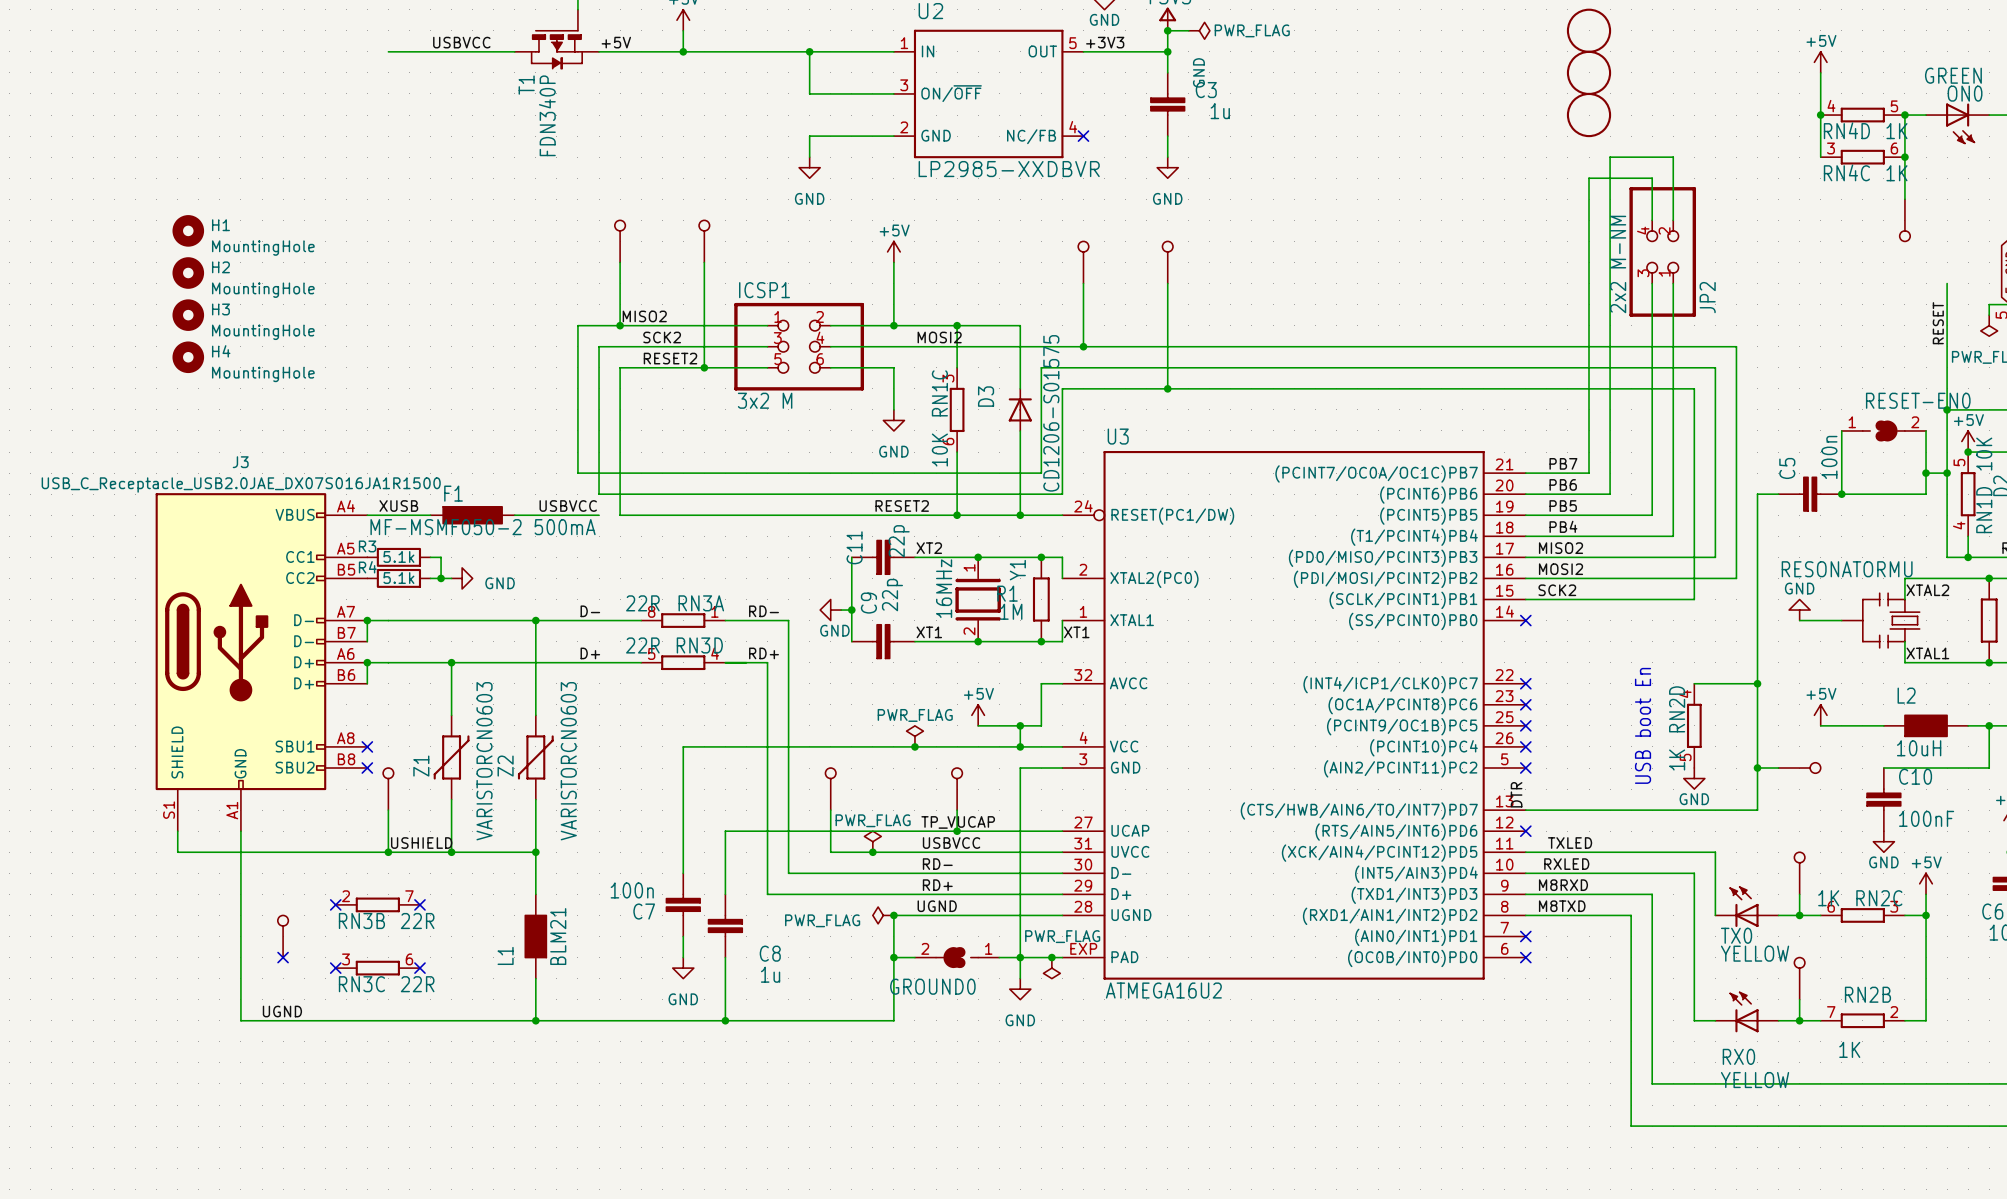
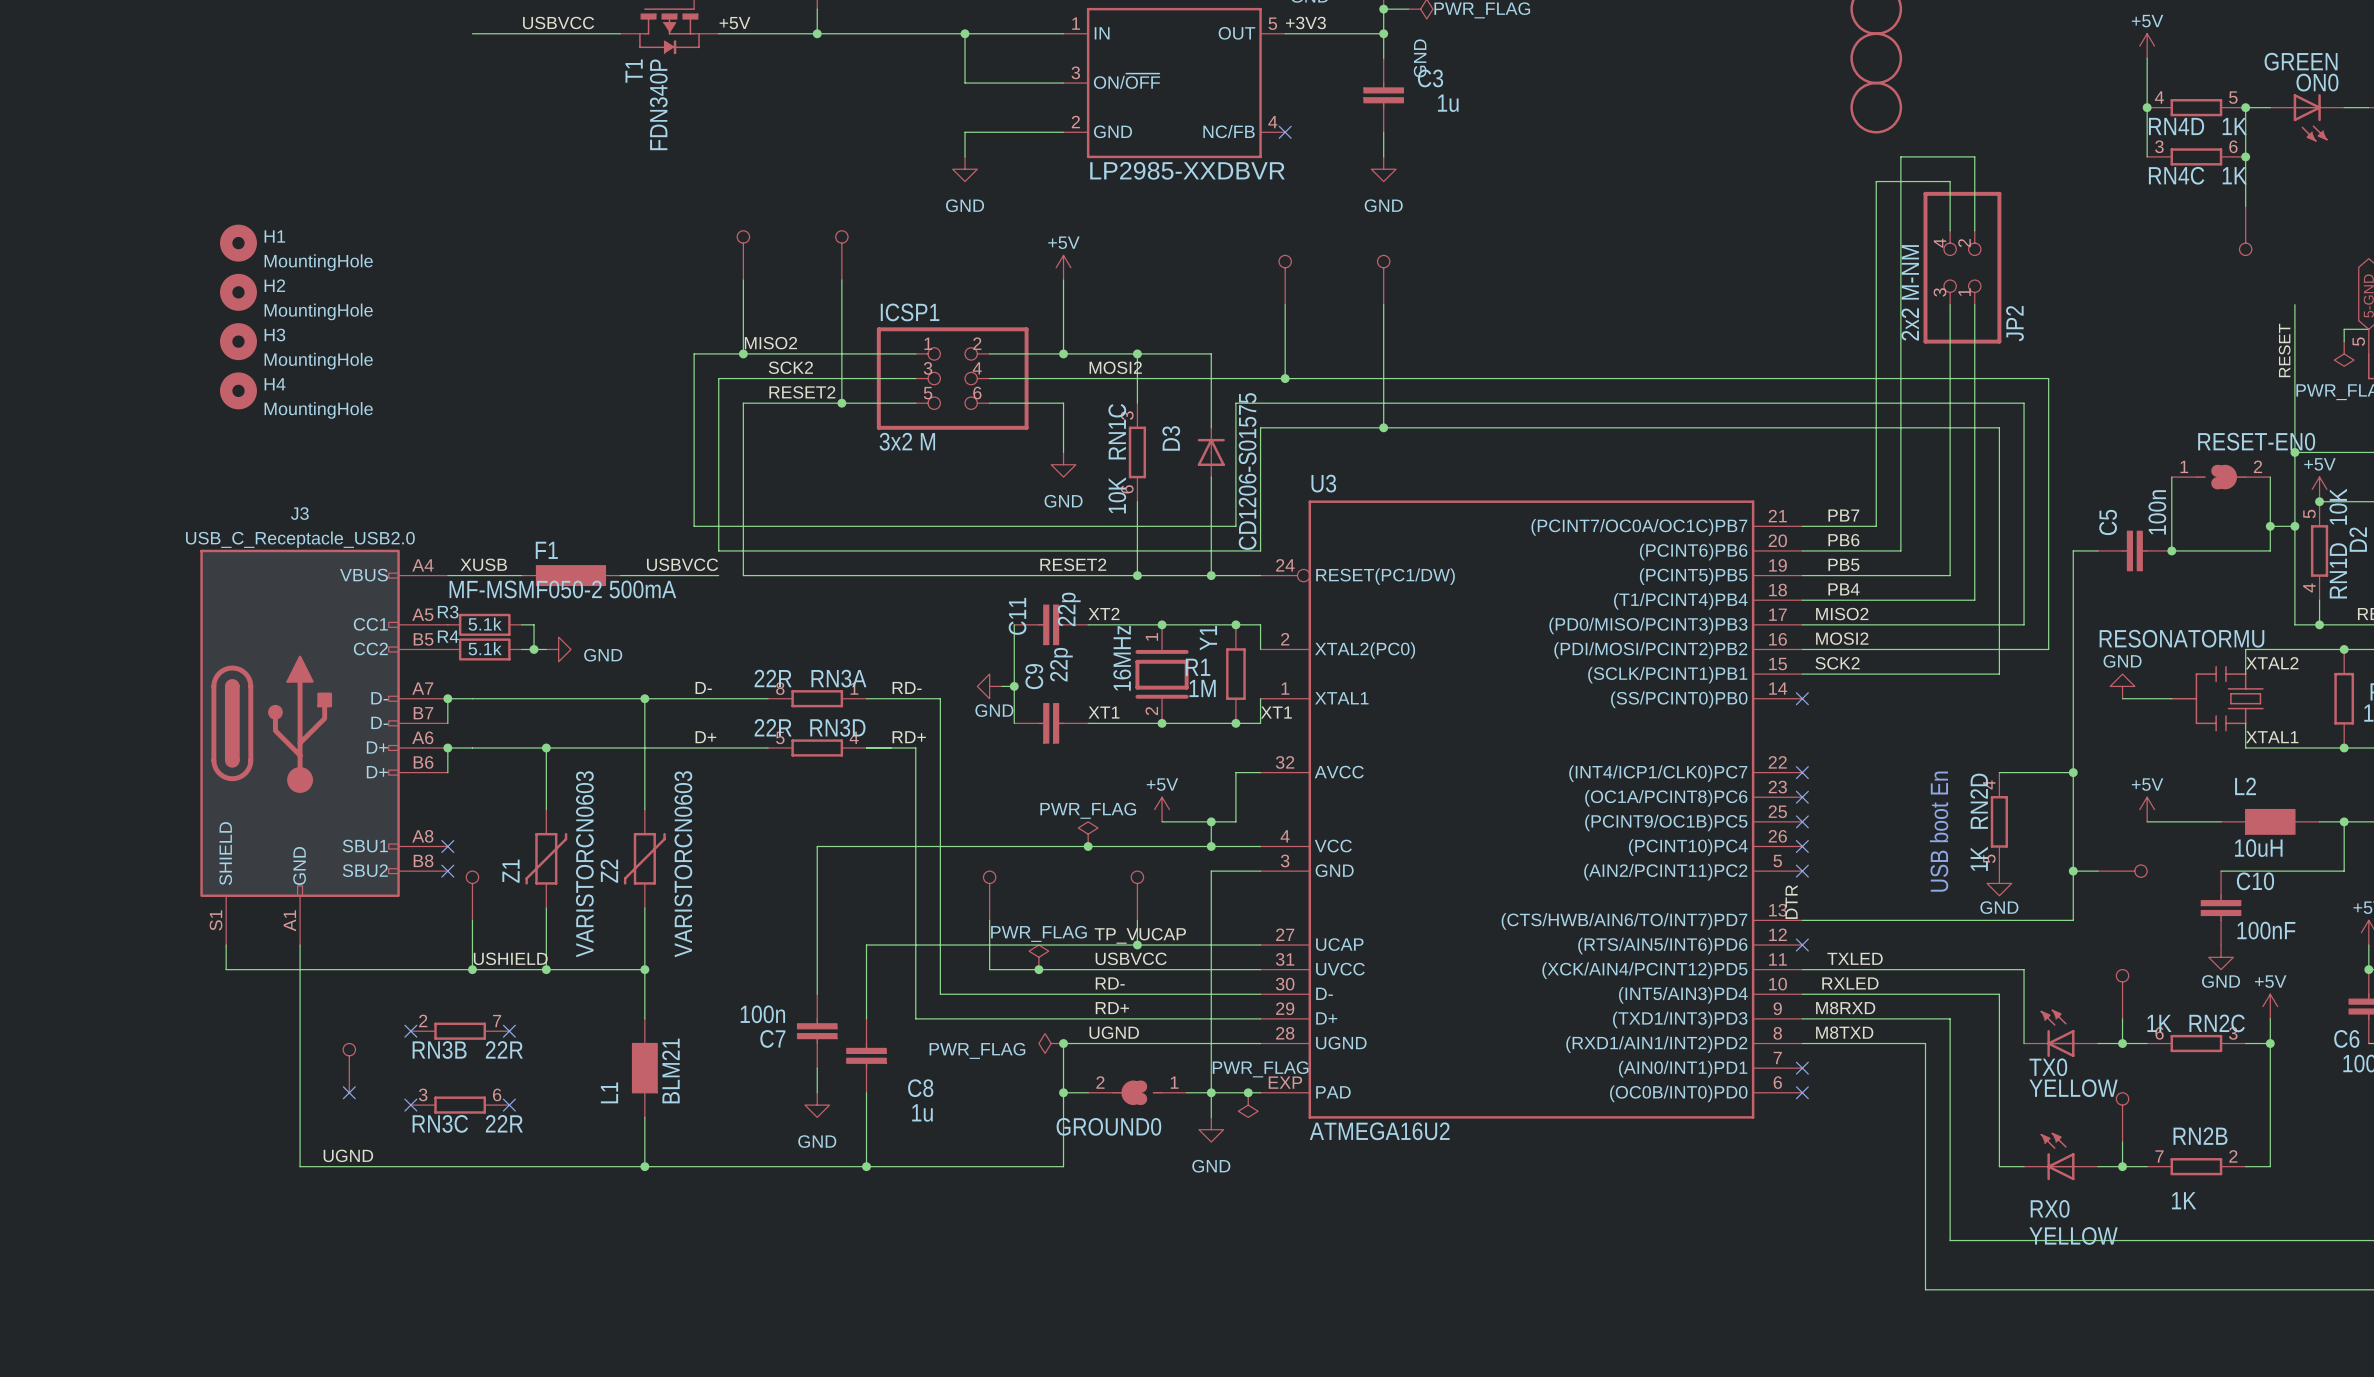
J3 value: USB_C_Receptacle_USB2.0JAE_DX07S016JA1R1500 (241, 485) -> USB_C_Receptacle_USB2.0 (300, 539)

